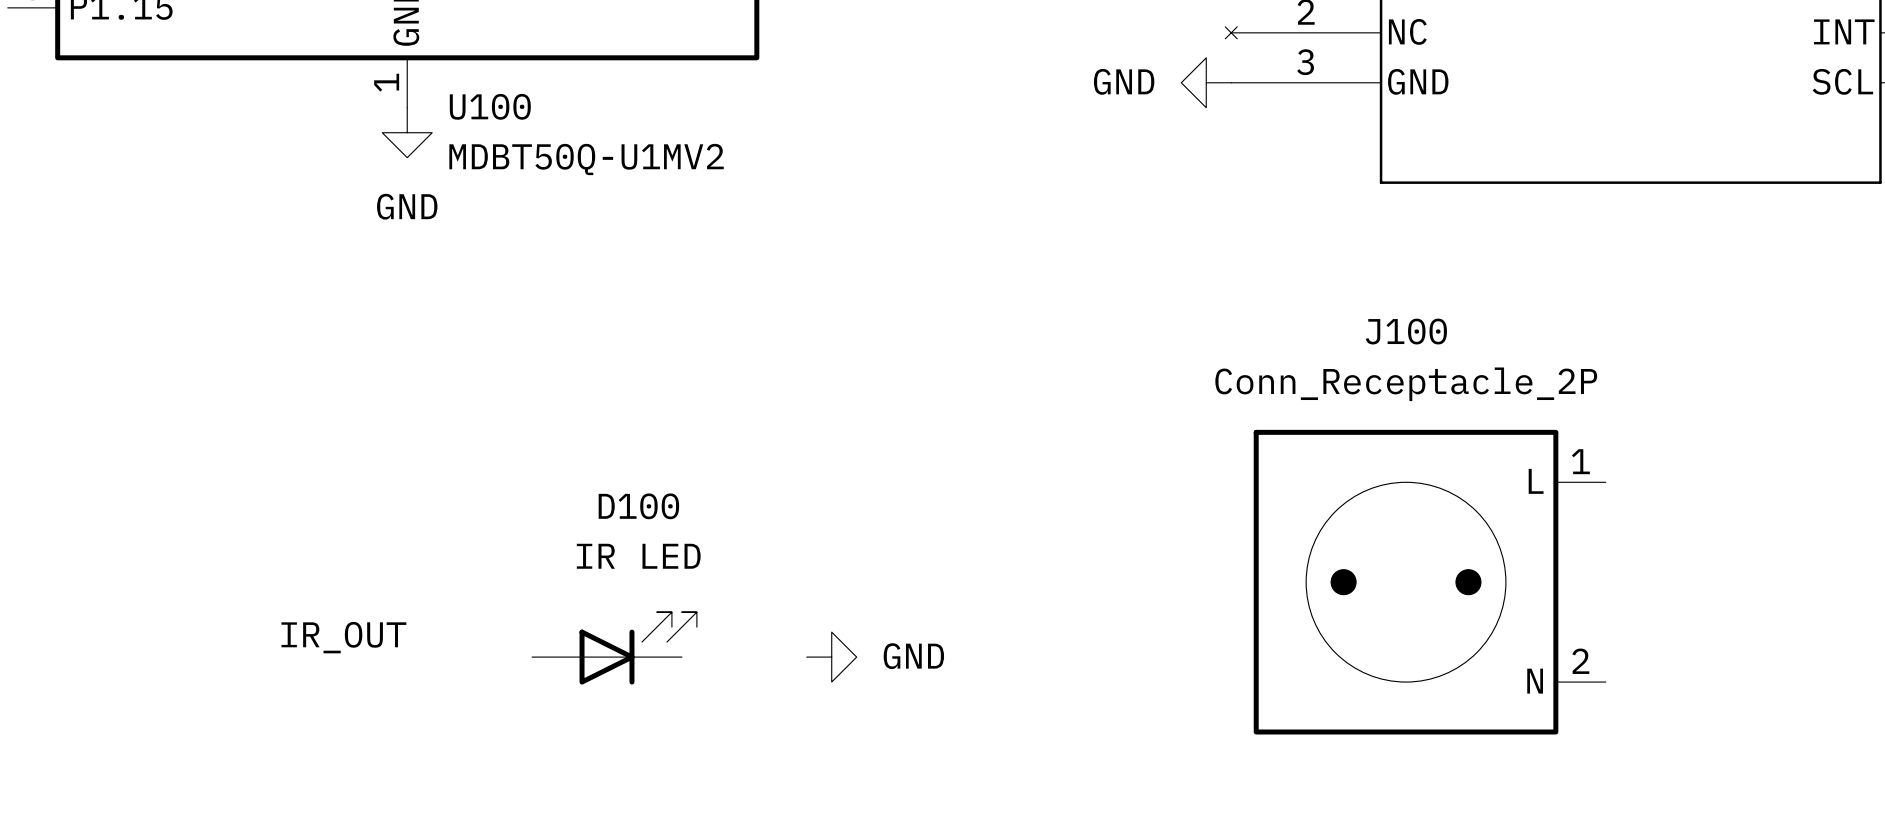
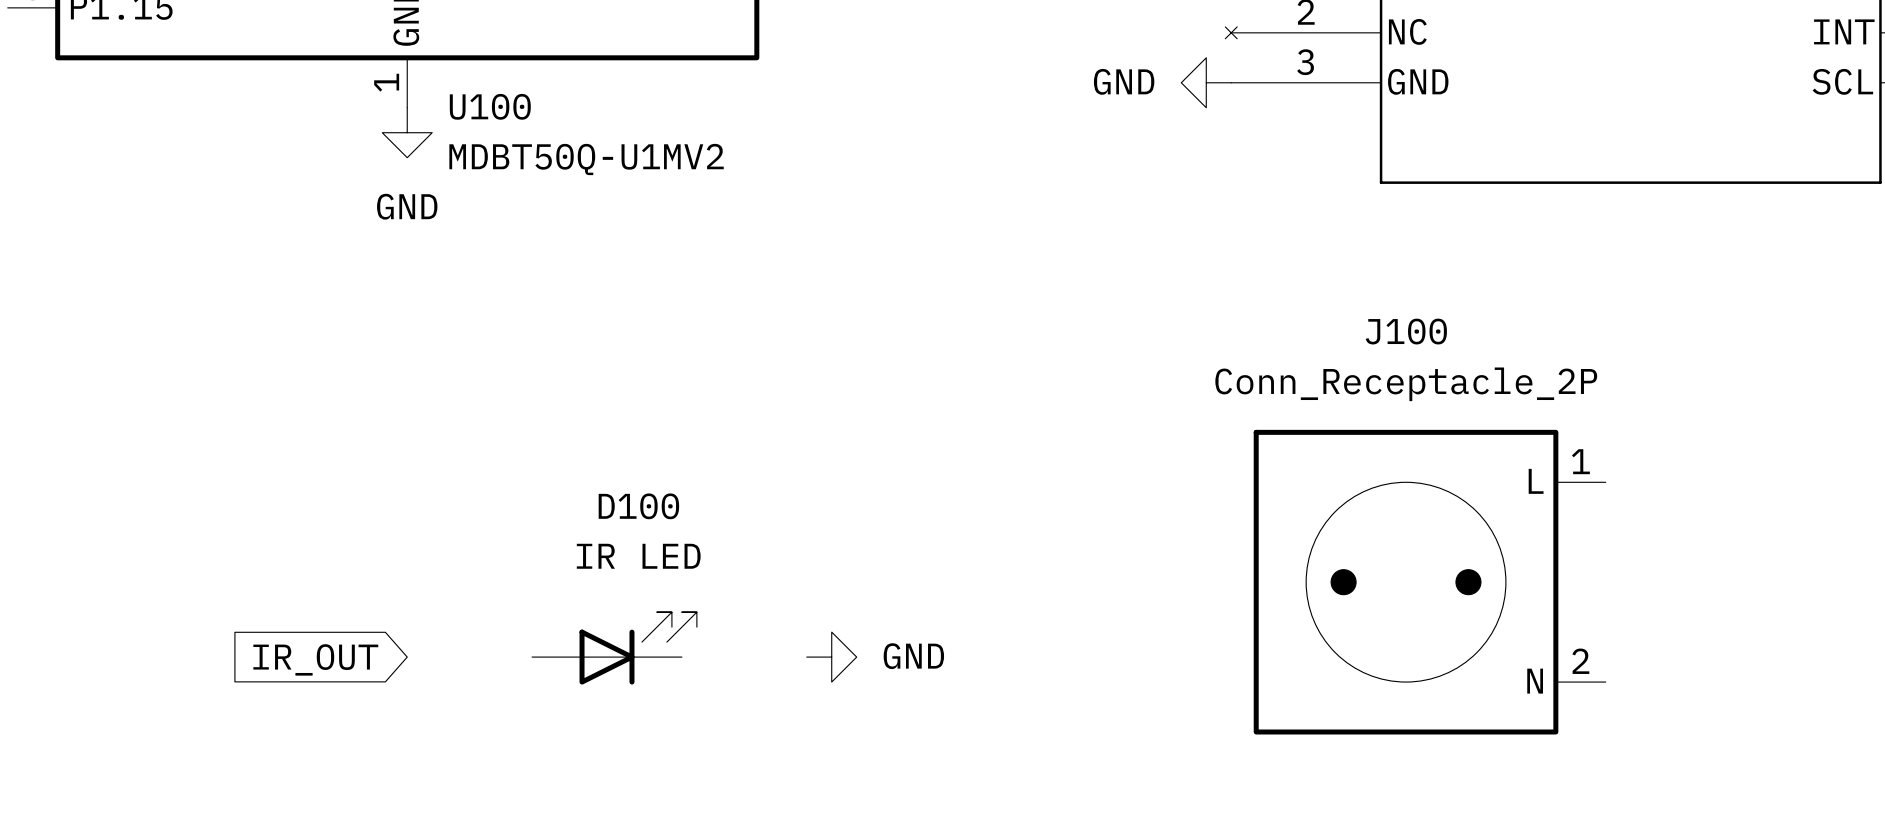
label: IR_OUT (343, 637) -> none
global label: none -> IR_OUT (315, 659)

